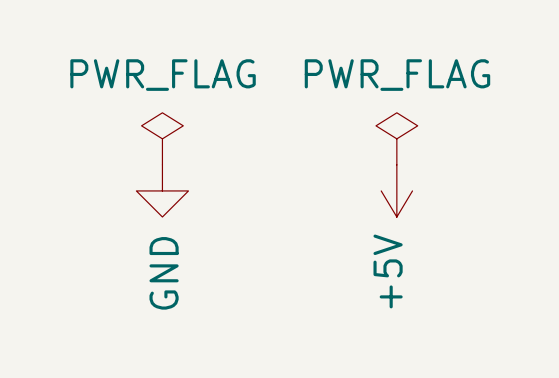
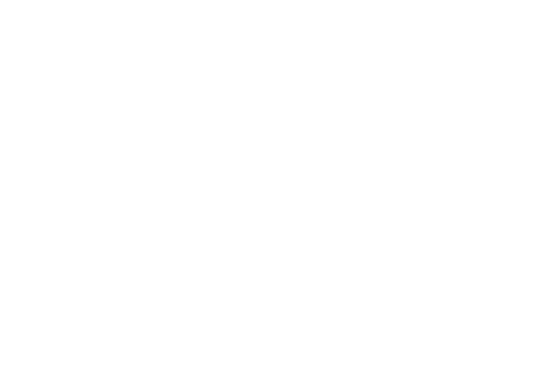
power symbol: PWR_FLAG (162, 138) -> none
power symbol: PWR_FLAG (396, 138) -> none
power symbol: GND (162, 190) -> none
power symbol: +5V (396, 190) -> none

